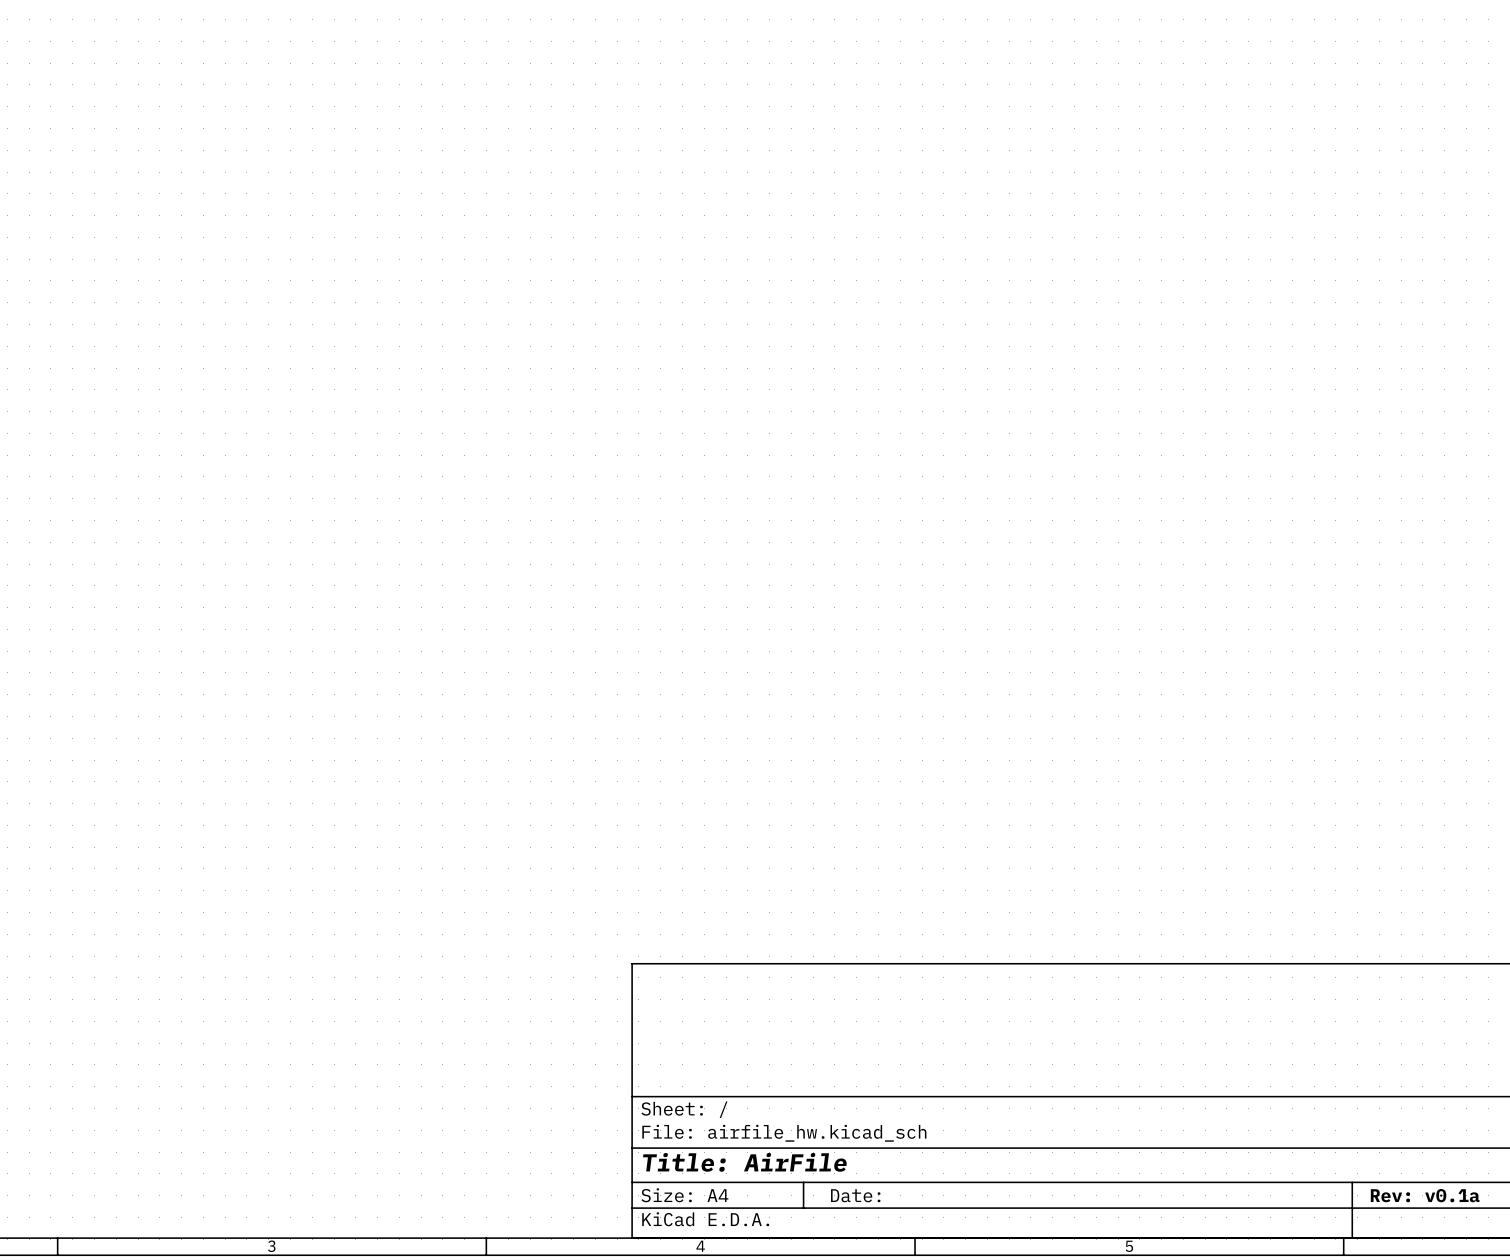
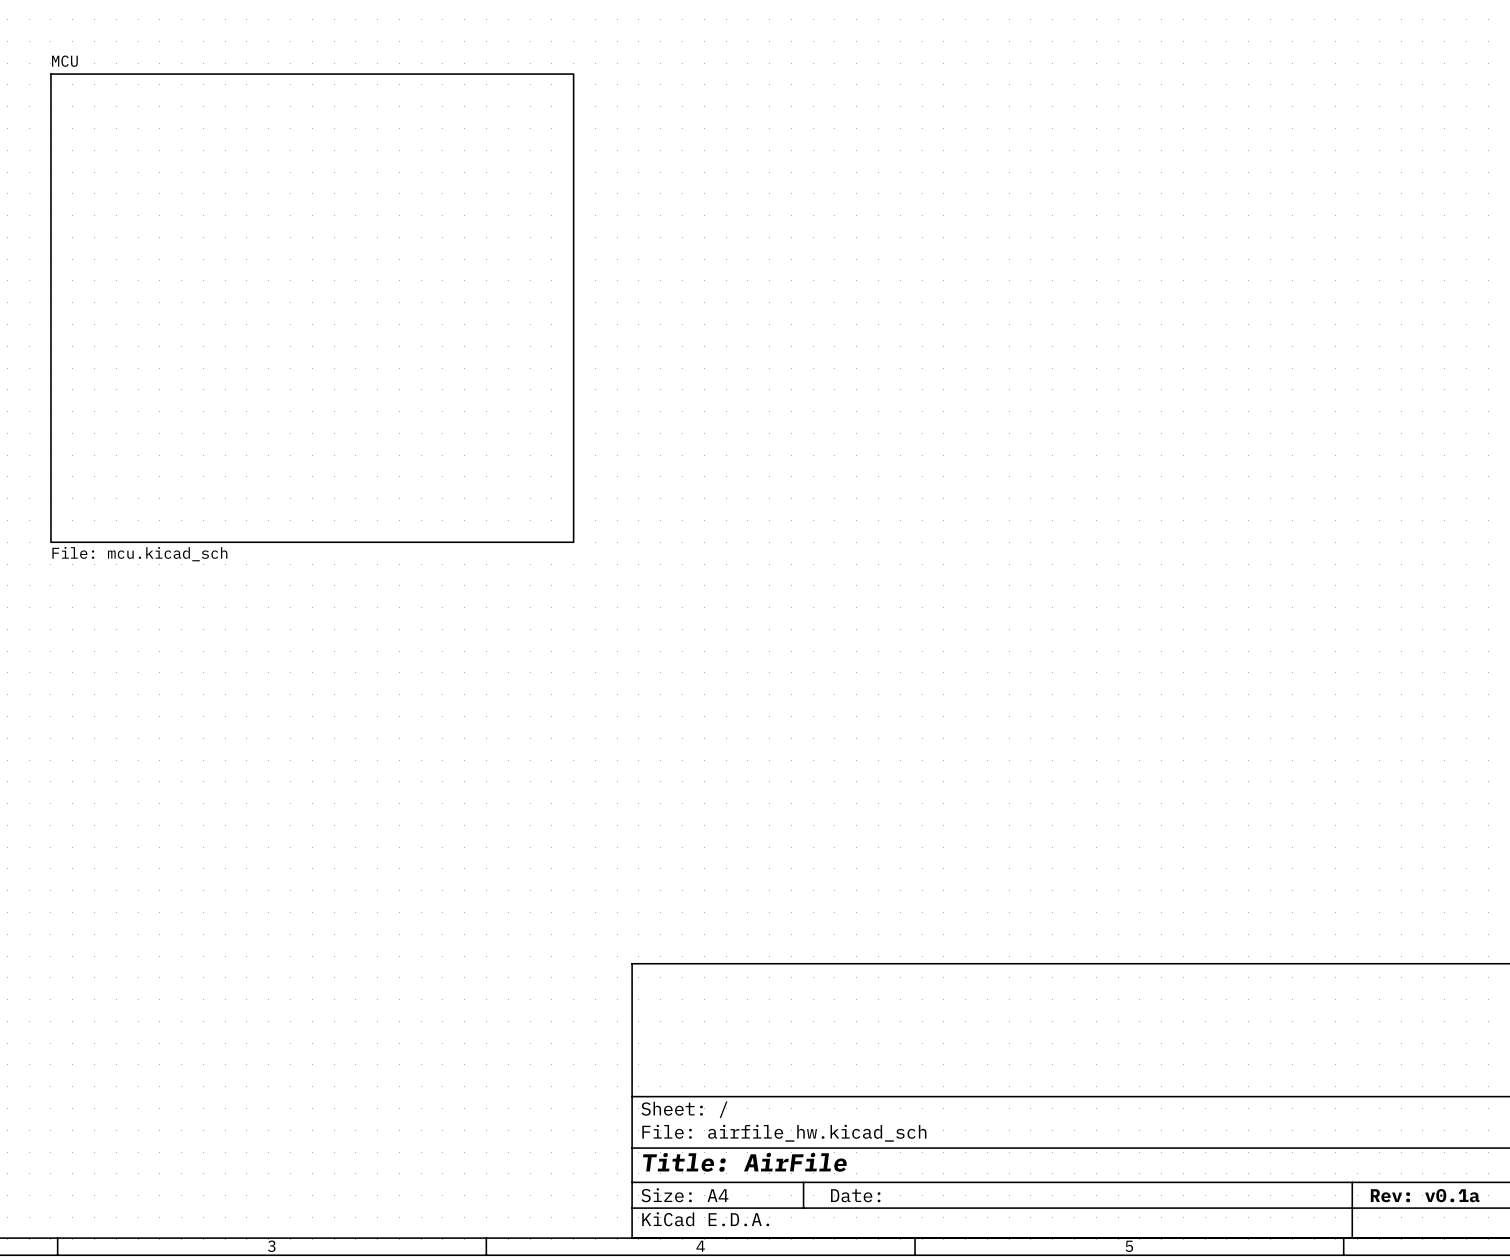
sheet MCU: none -> File: mcu.kicad_sch (312, 308)

